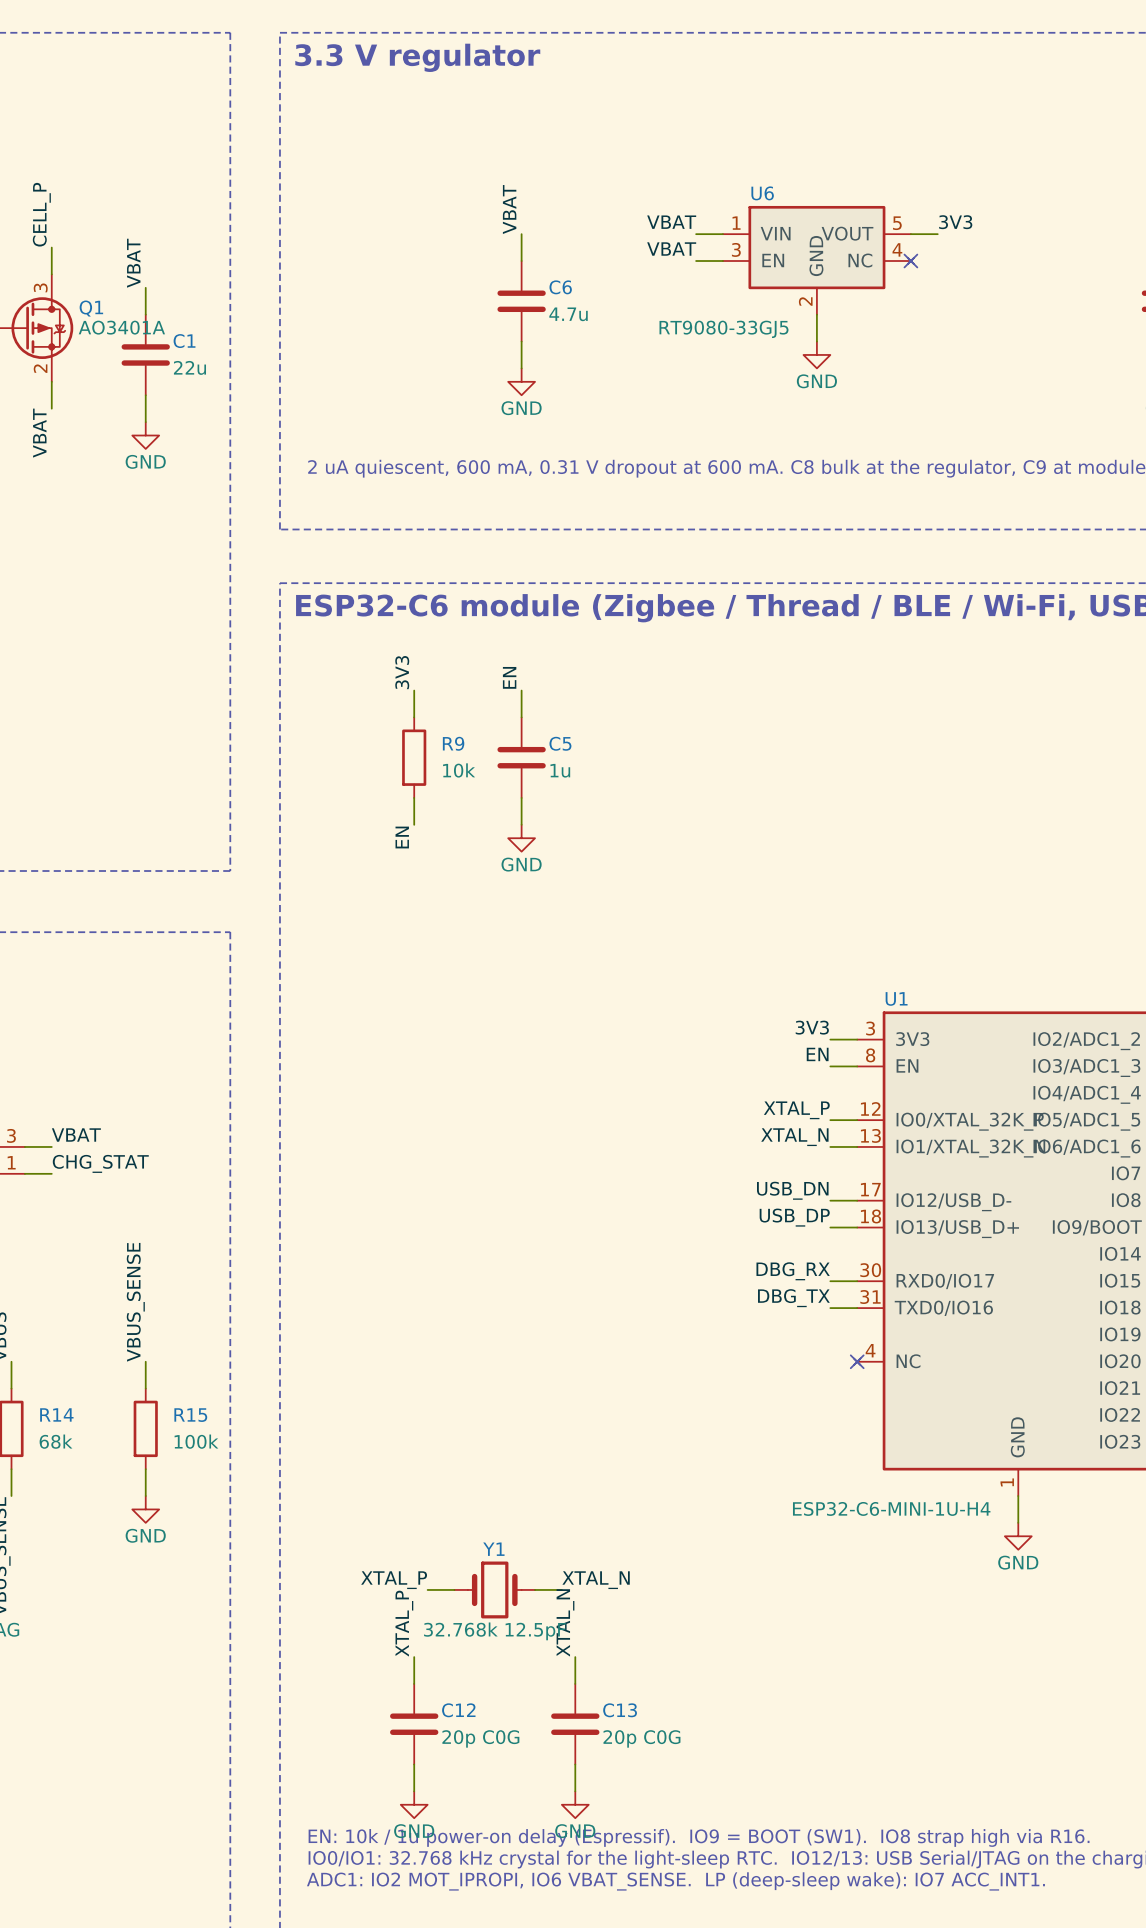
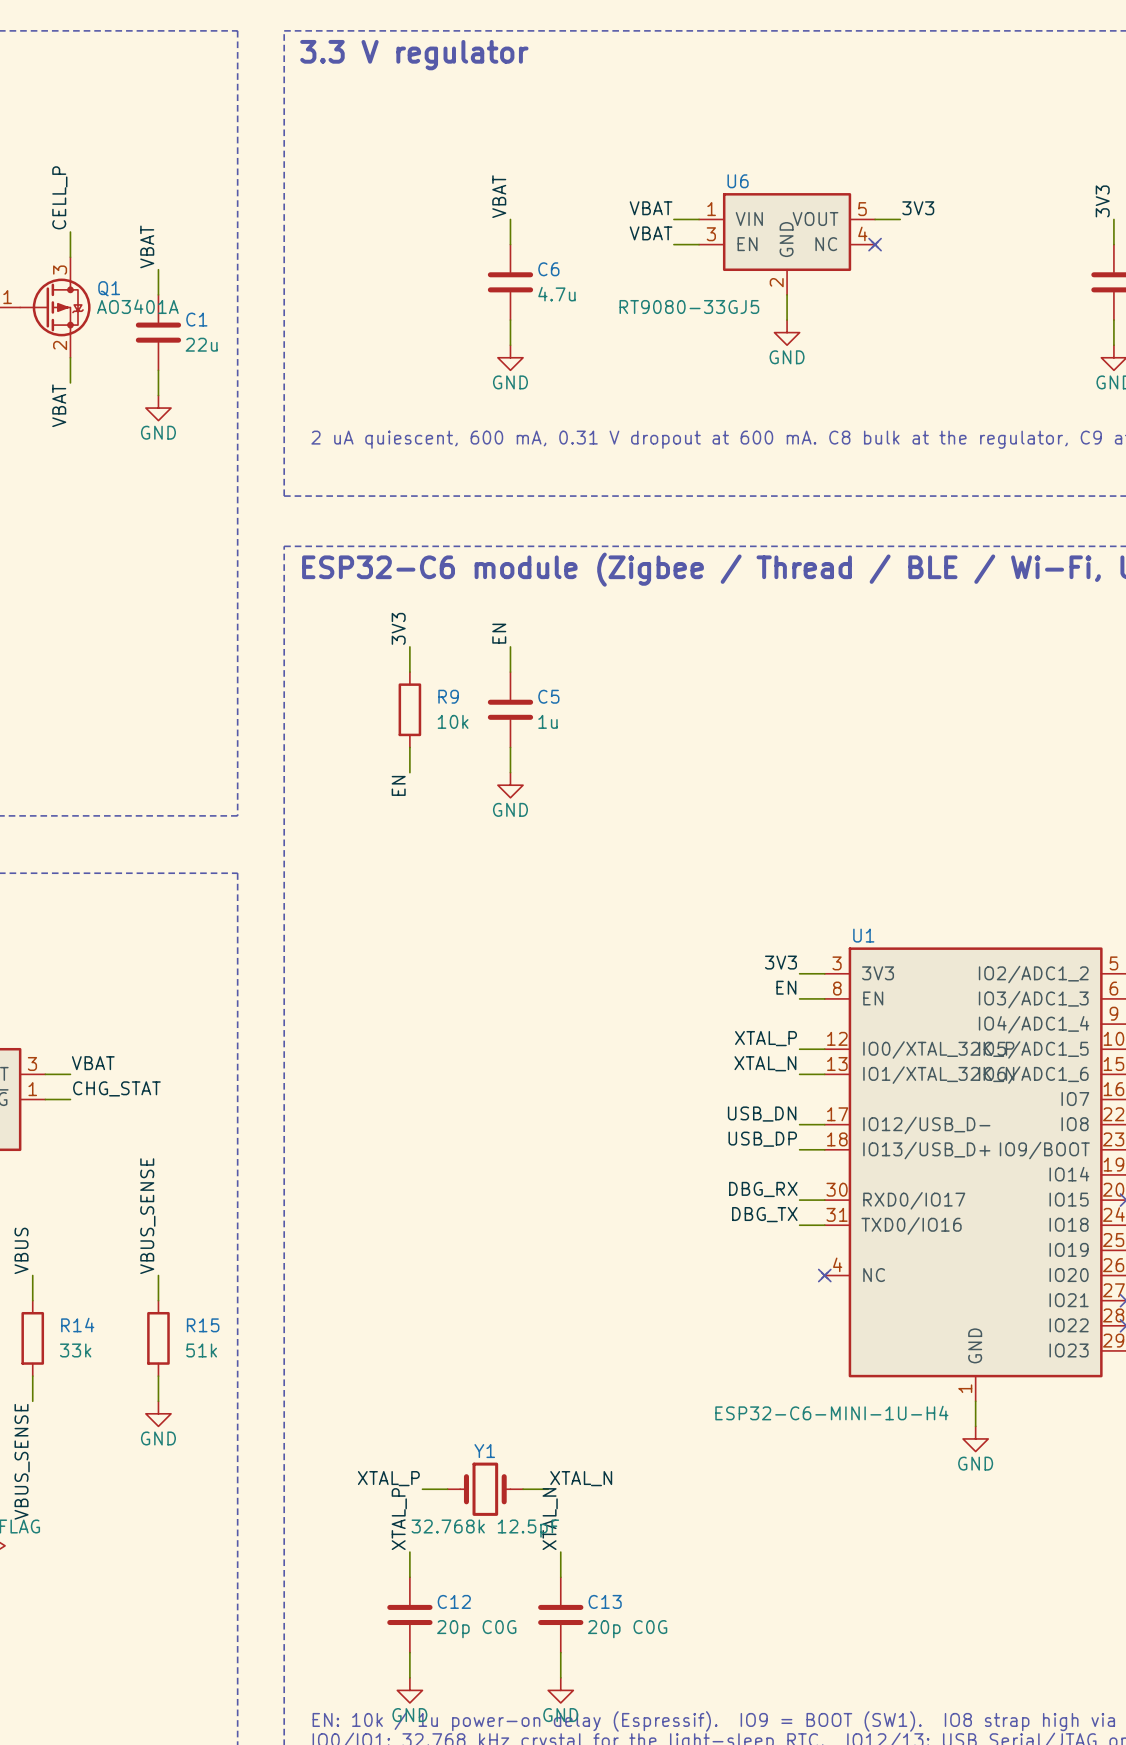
R14 value: 68k (56, 1441) -> 33k (75, 1350)
R15 value: 100k (196, 1441) -> 51k (201, 1350)

